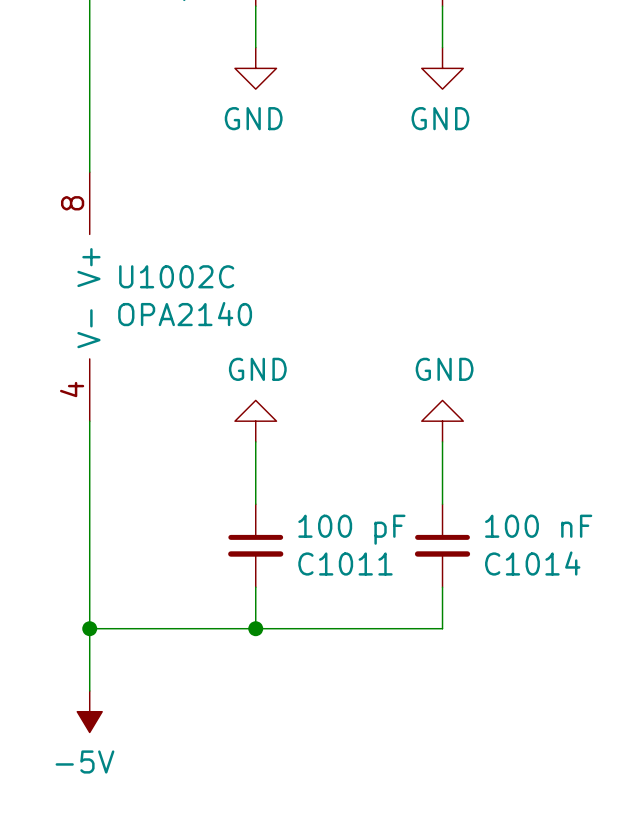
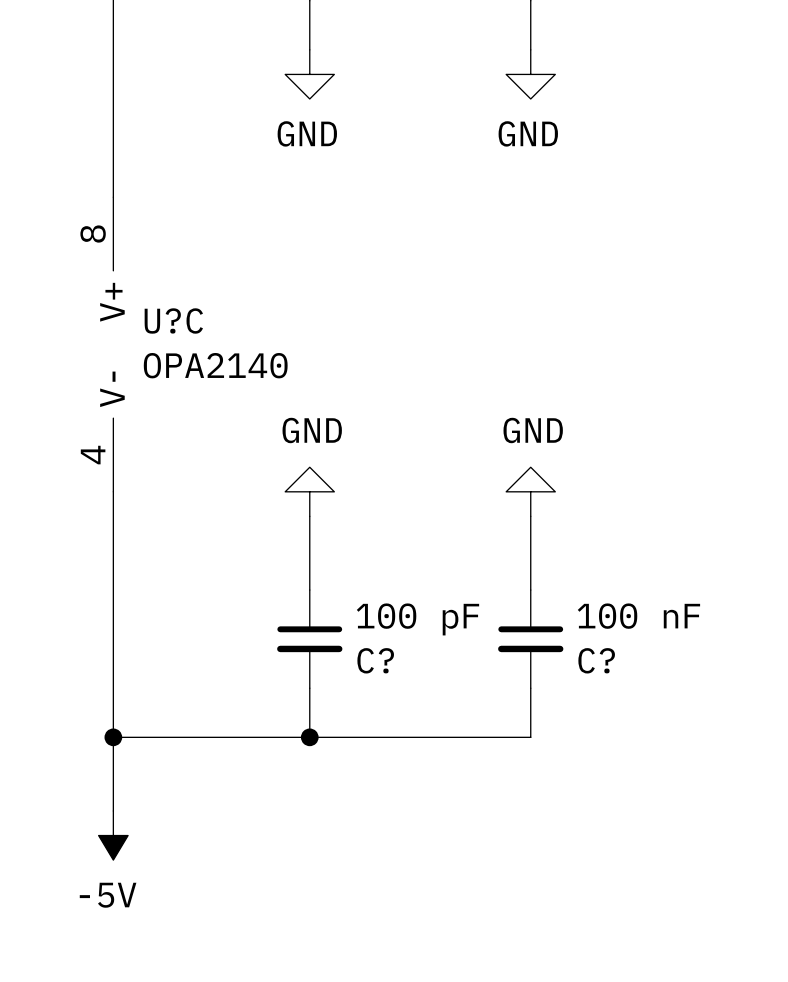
U1002C name: U1002C (176, 276) -> U?C (173, 320)
C1014 name: C1014 (532, 563) -> C? (596, 660)
C1011 name: C1011 (345, 564) -> C? (375, 660)

